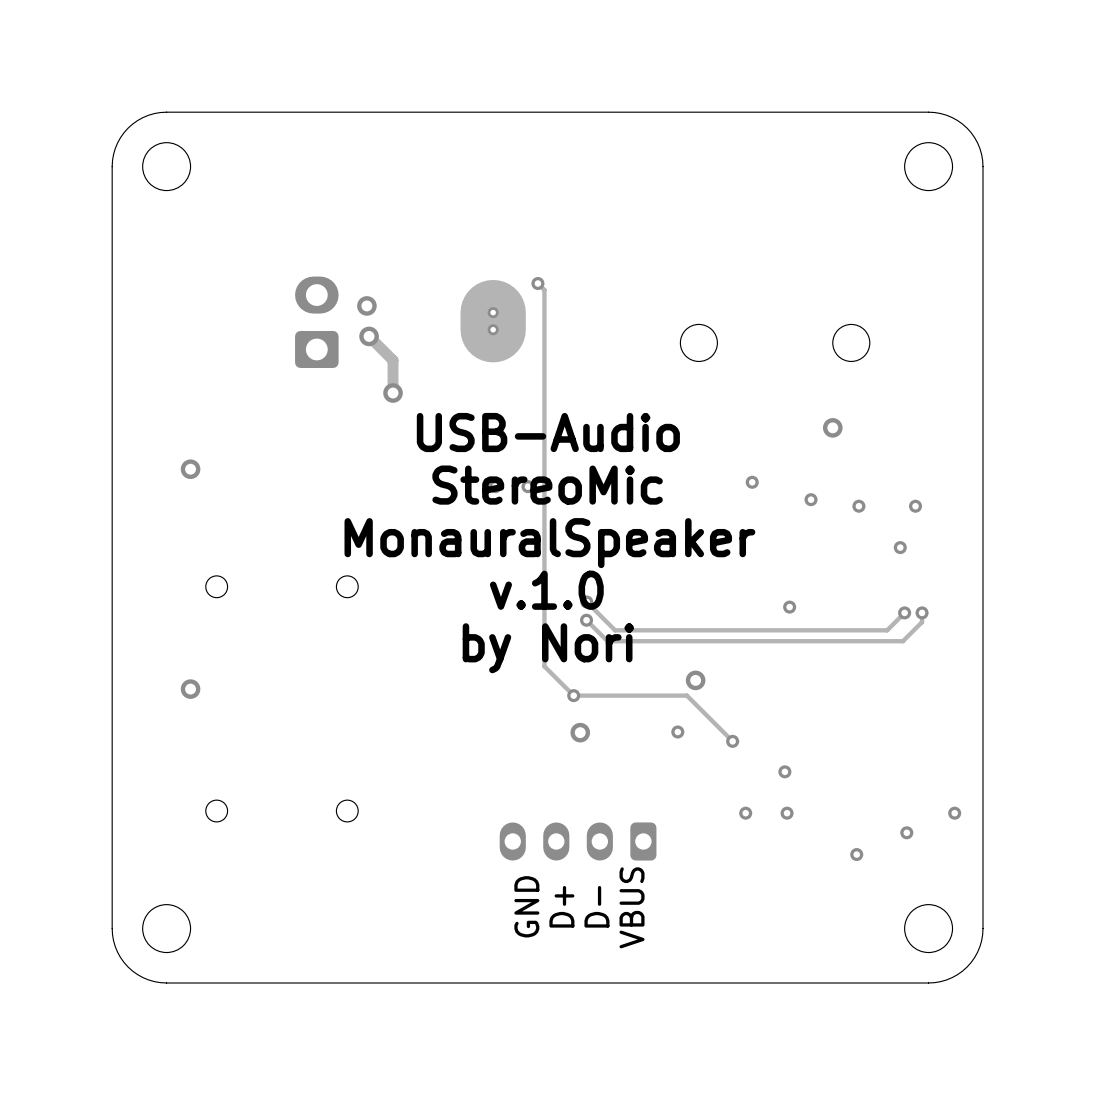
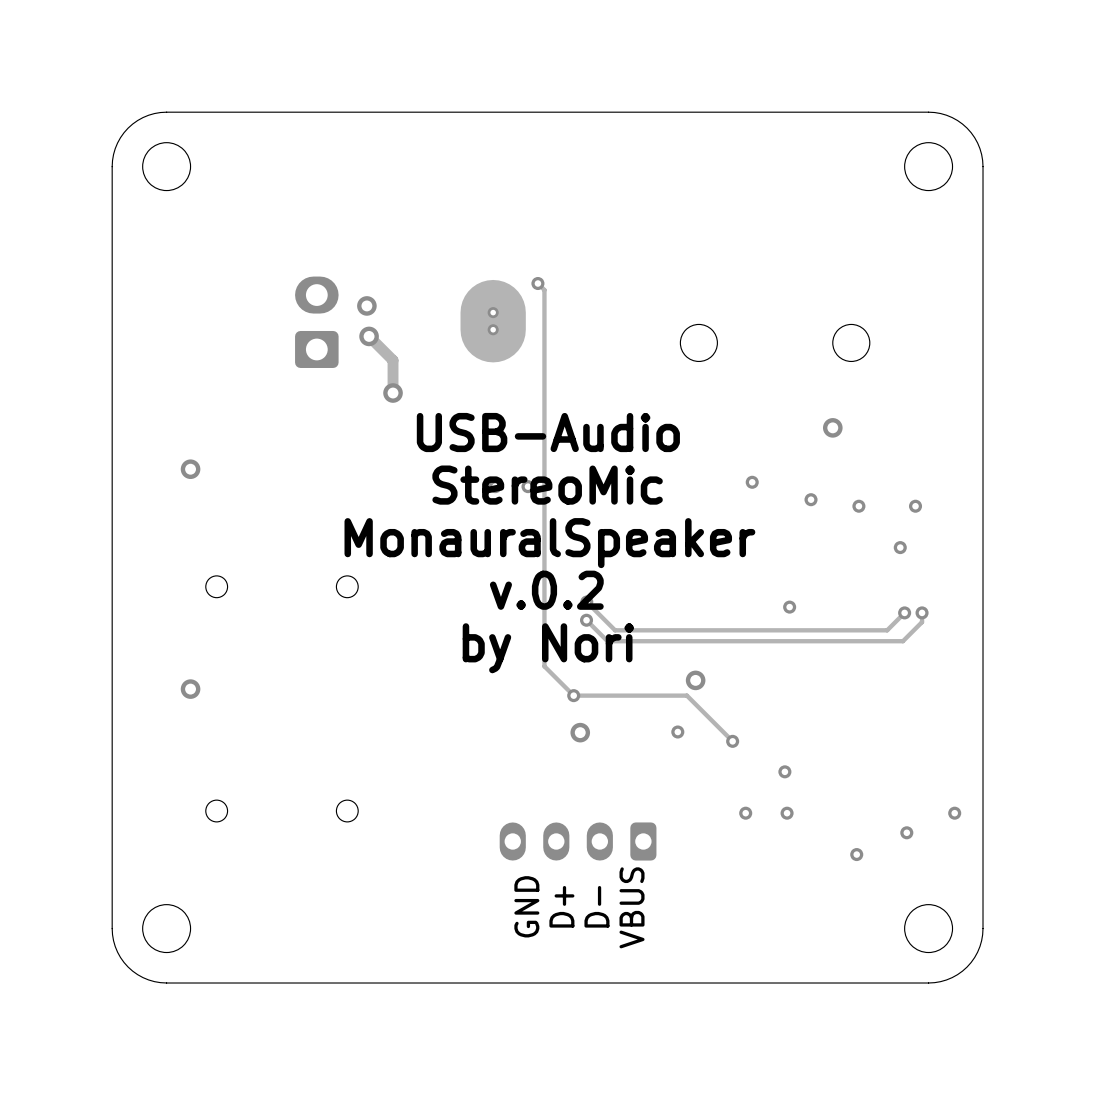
text: v.1.0 (546, 590) -> v.0.2 (546, 590)

